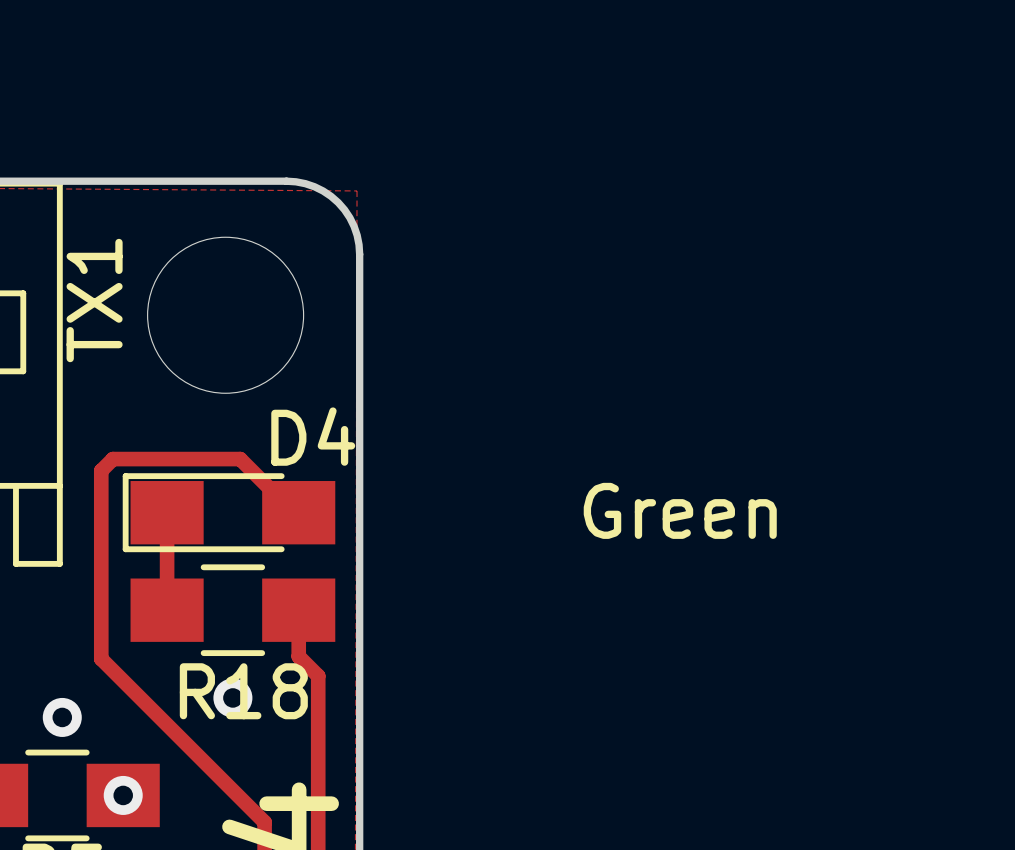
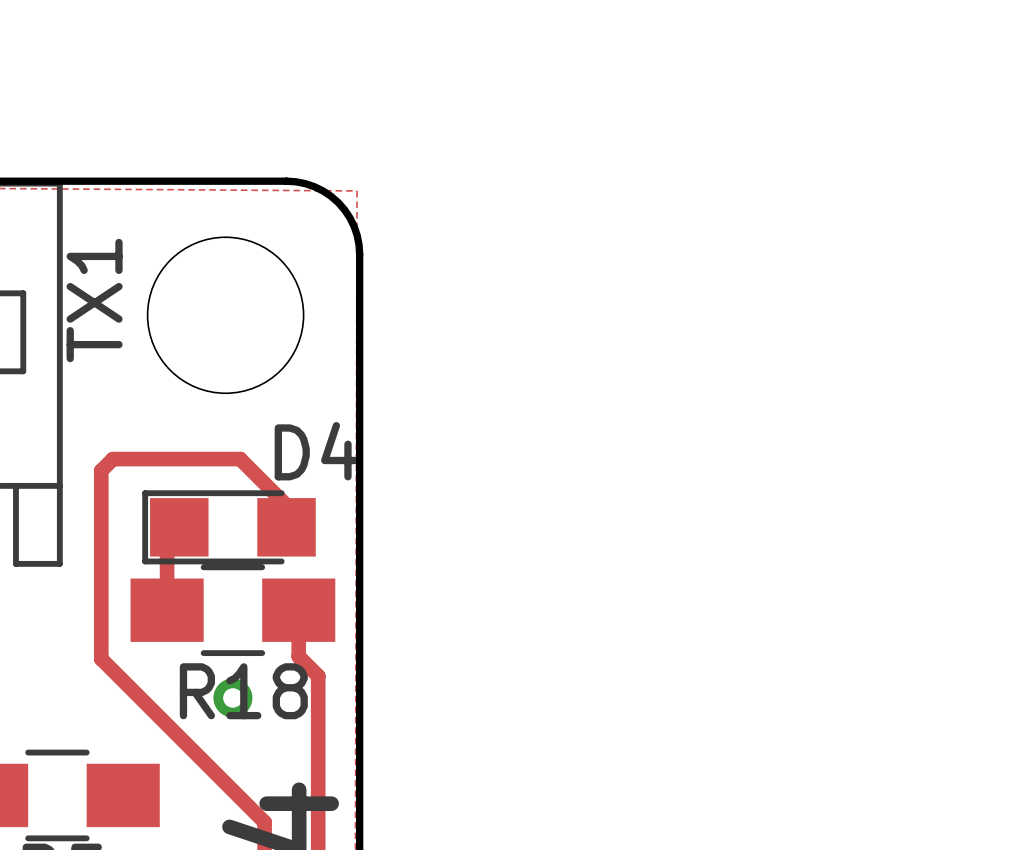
D4 name position: D4 (313, 436) -> D4 (316, 451)
D4 footprint: [122, 473, 336, 553] -> [142, 490, 316, 565]
D4 value: Green (680, 510) -> none
via: (62, 717) -> none
via: (123, 795) -> none

